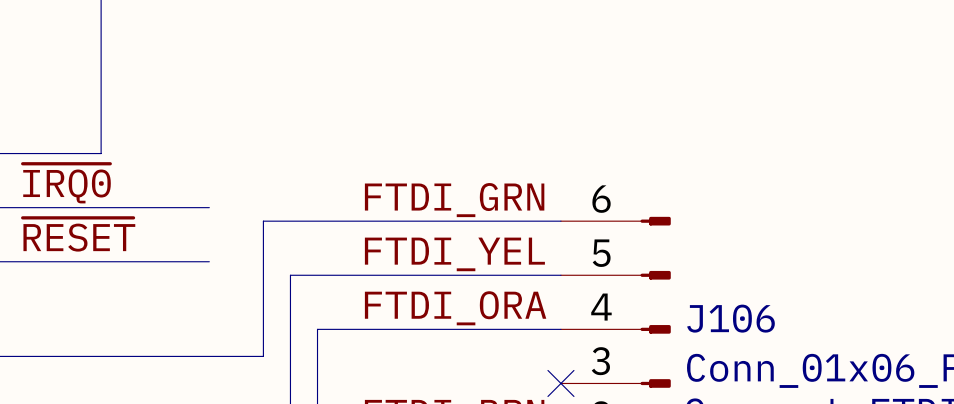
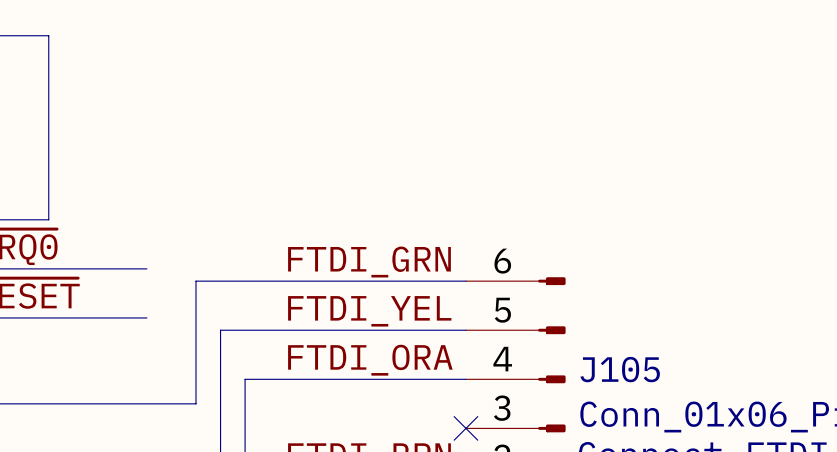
J106 name: J106 (731, 318) -> J105 (620, 369)

